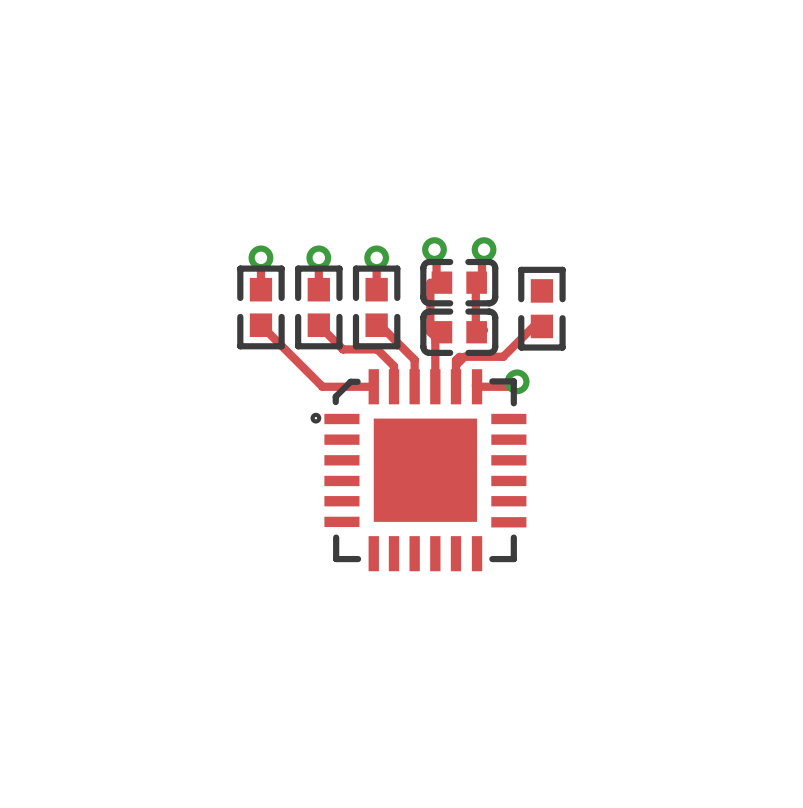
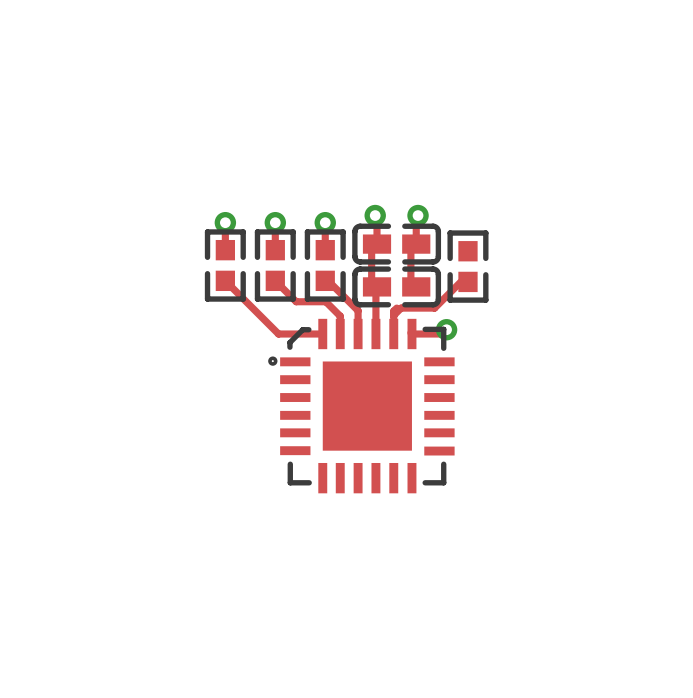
part footprint: [420, 258, 499, 307] -> [352, 223, 442, 265]
part footprint: [420, 308, 499, 356] -> [352, 266, 442, 308]

